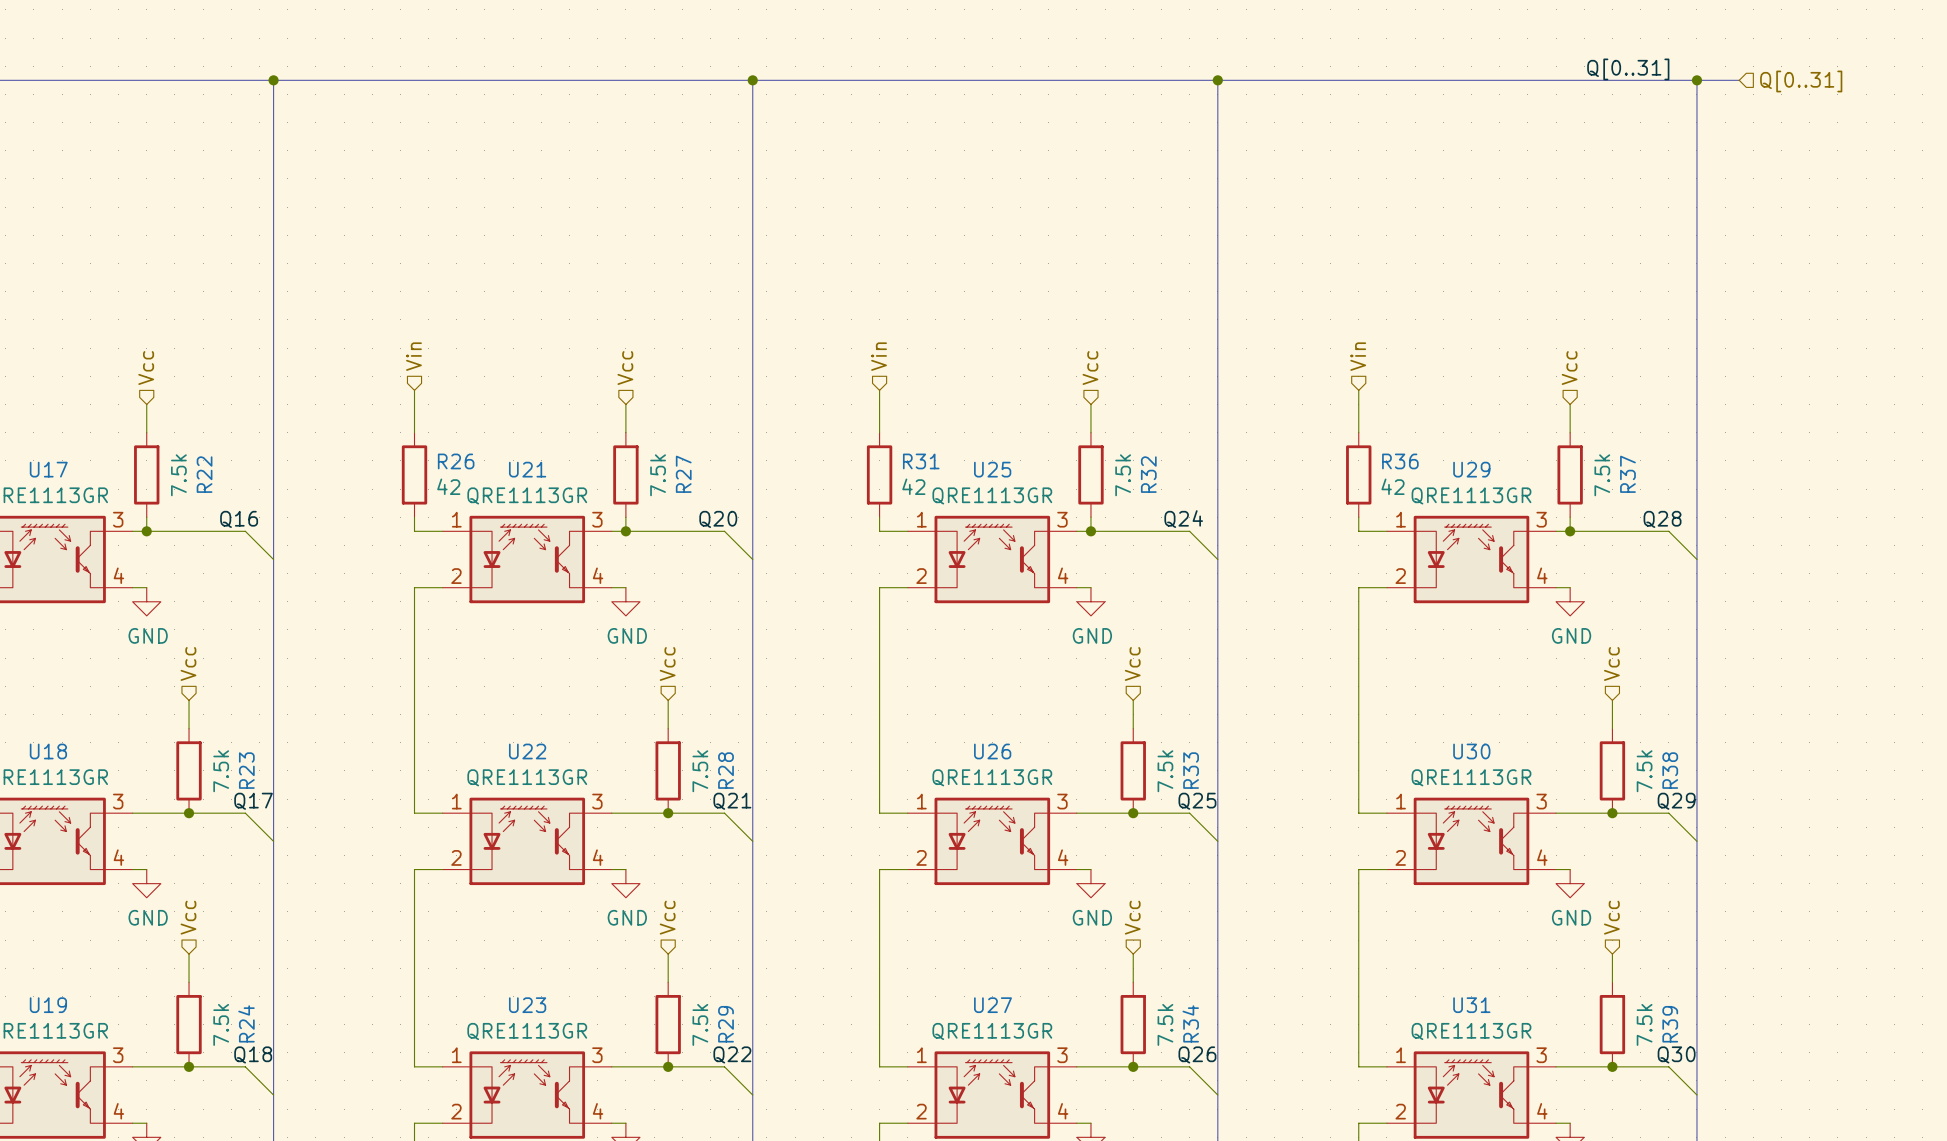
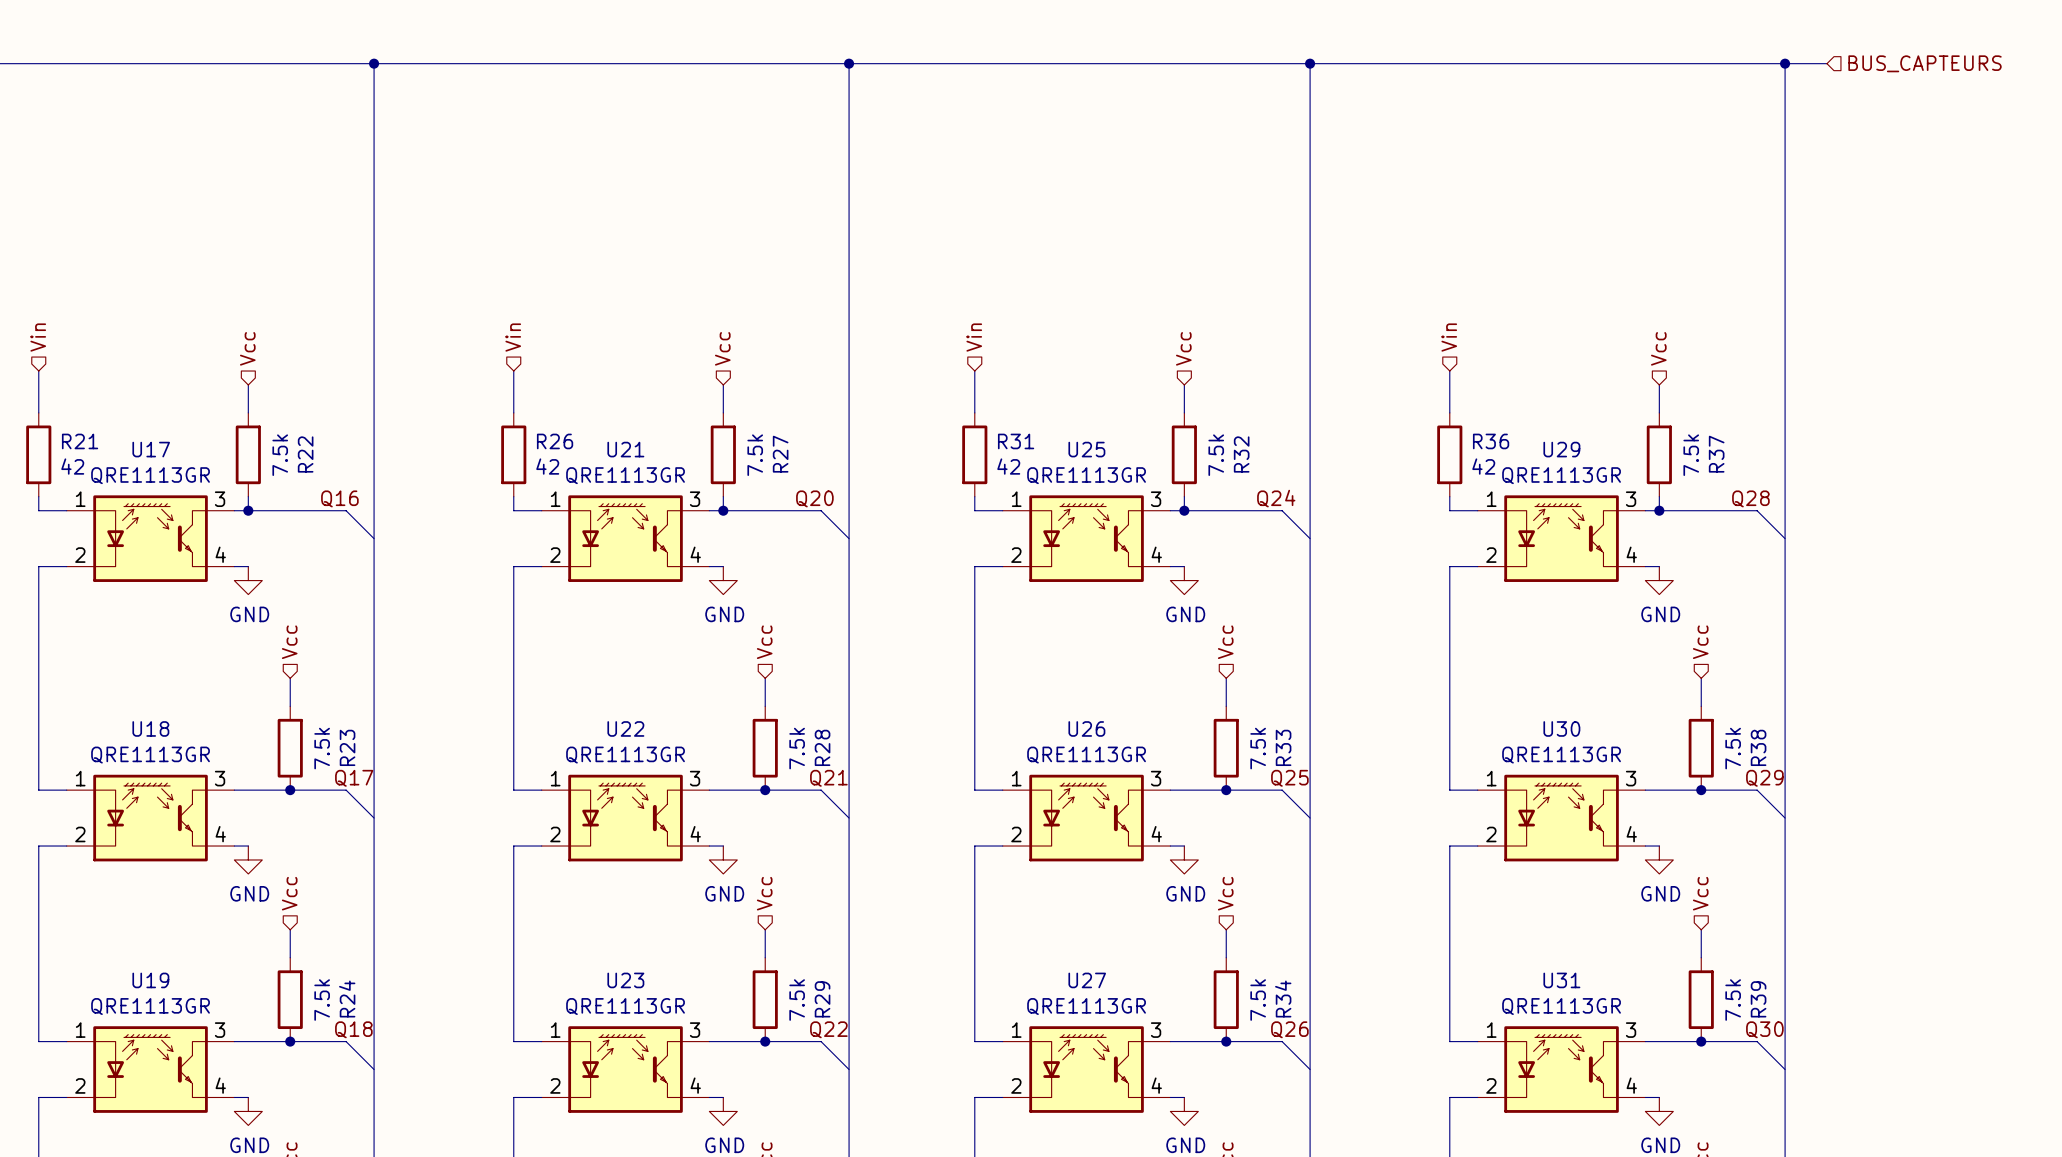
label: Q[0..31] (1628, 69) -> none
hierarchical label: Q[0..31] (1801, 81) -> BUS_CAPTEURS (1925, 63)

